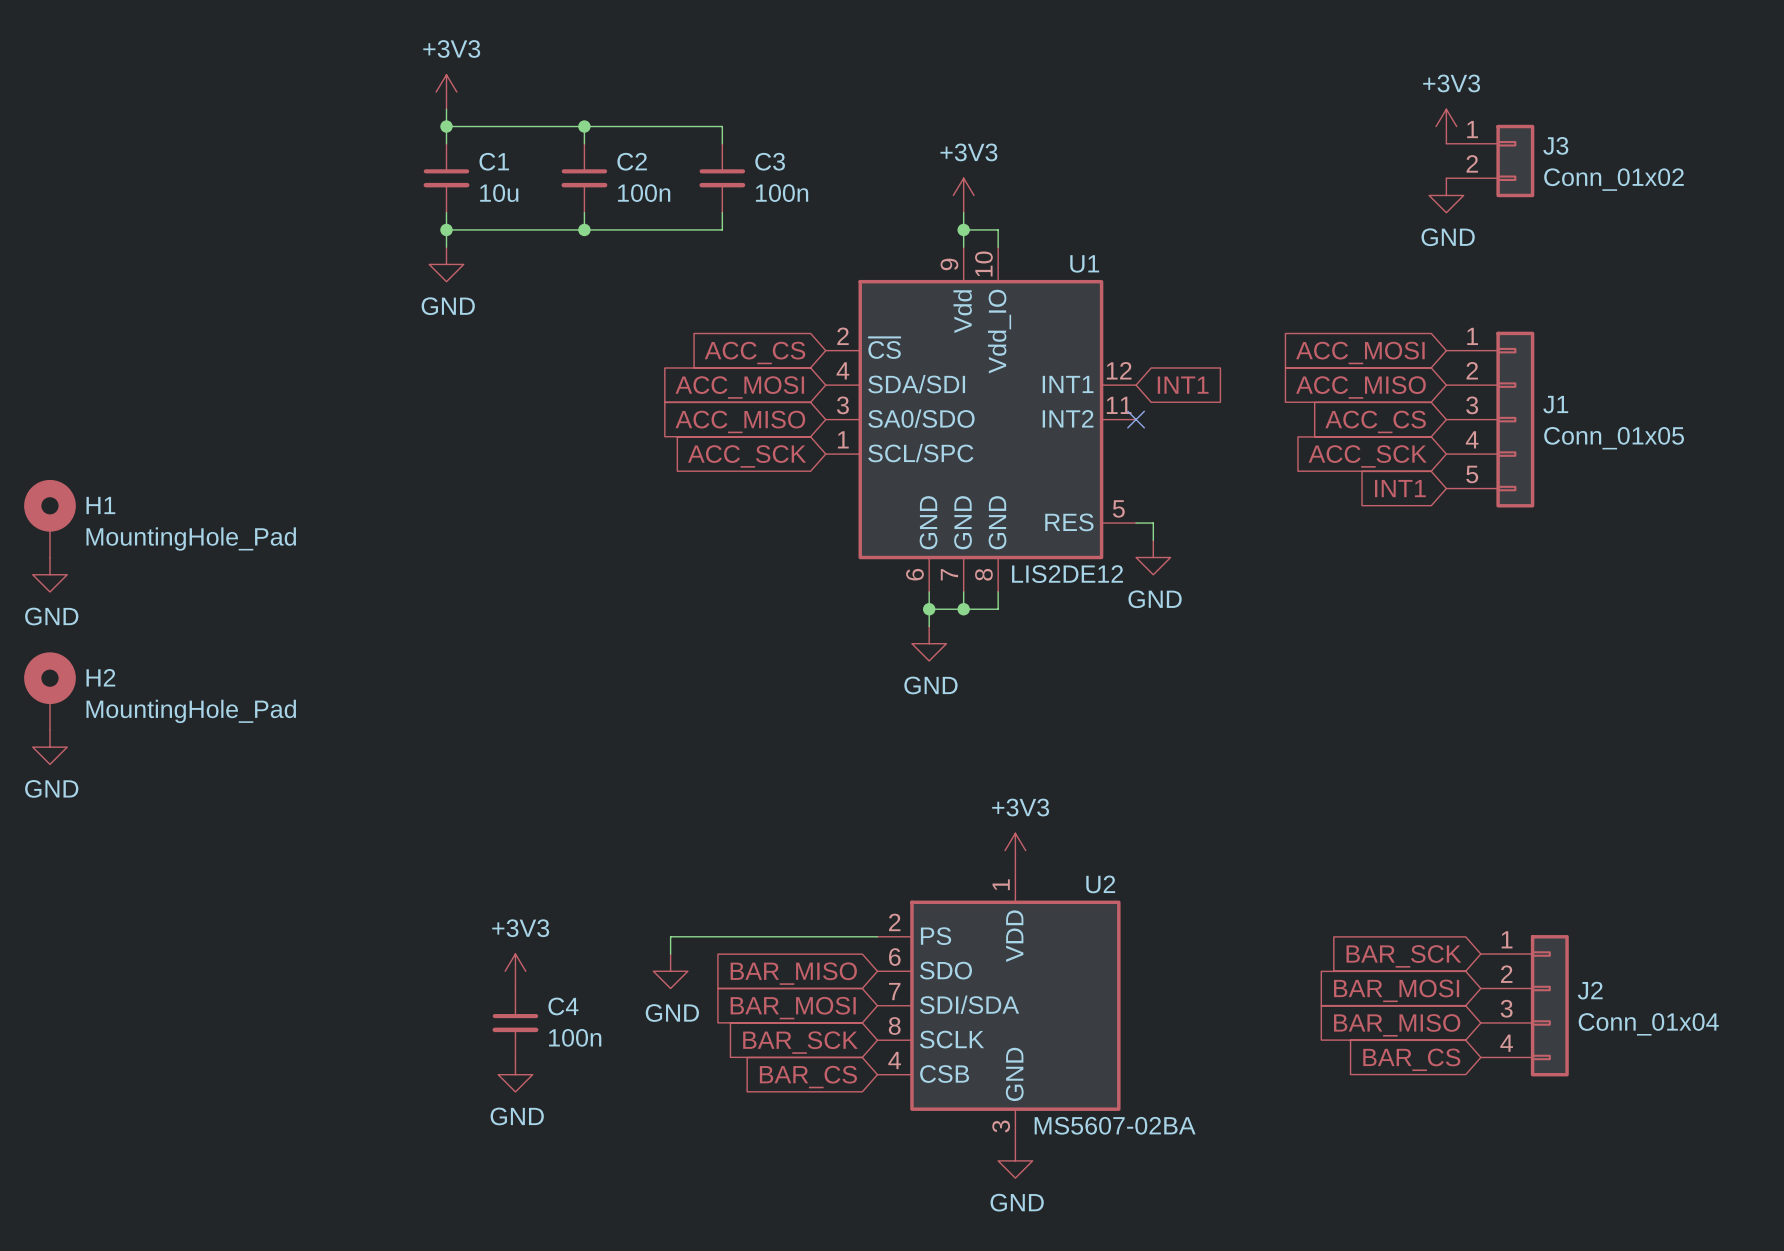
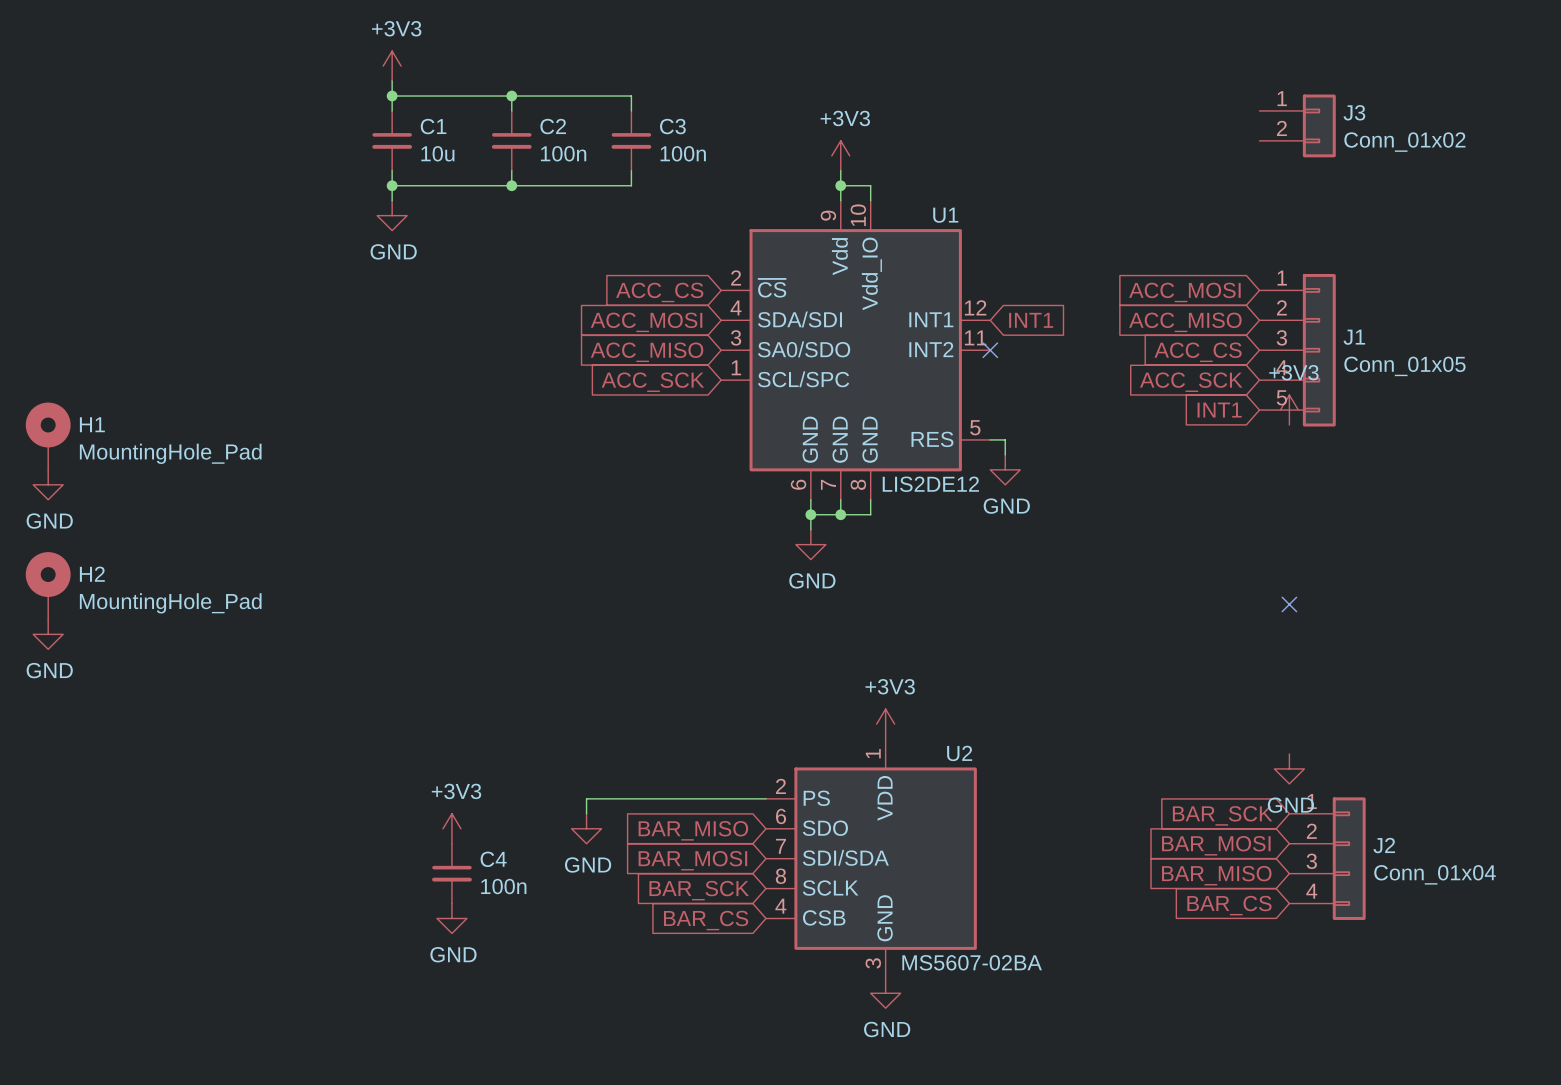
power symbol: +3V3 (1446, 126) -> none
power symbol: GND (1446, 195) -> none
power symbol: none -> +3V3 (1289, 410)
no-connect mark: none -> (1289, 604)
power symbol: none -> GND (1289, 768)

